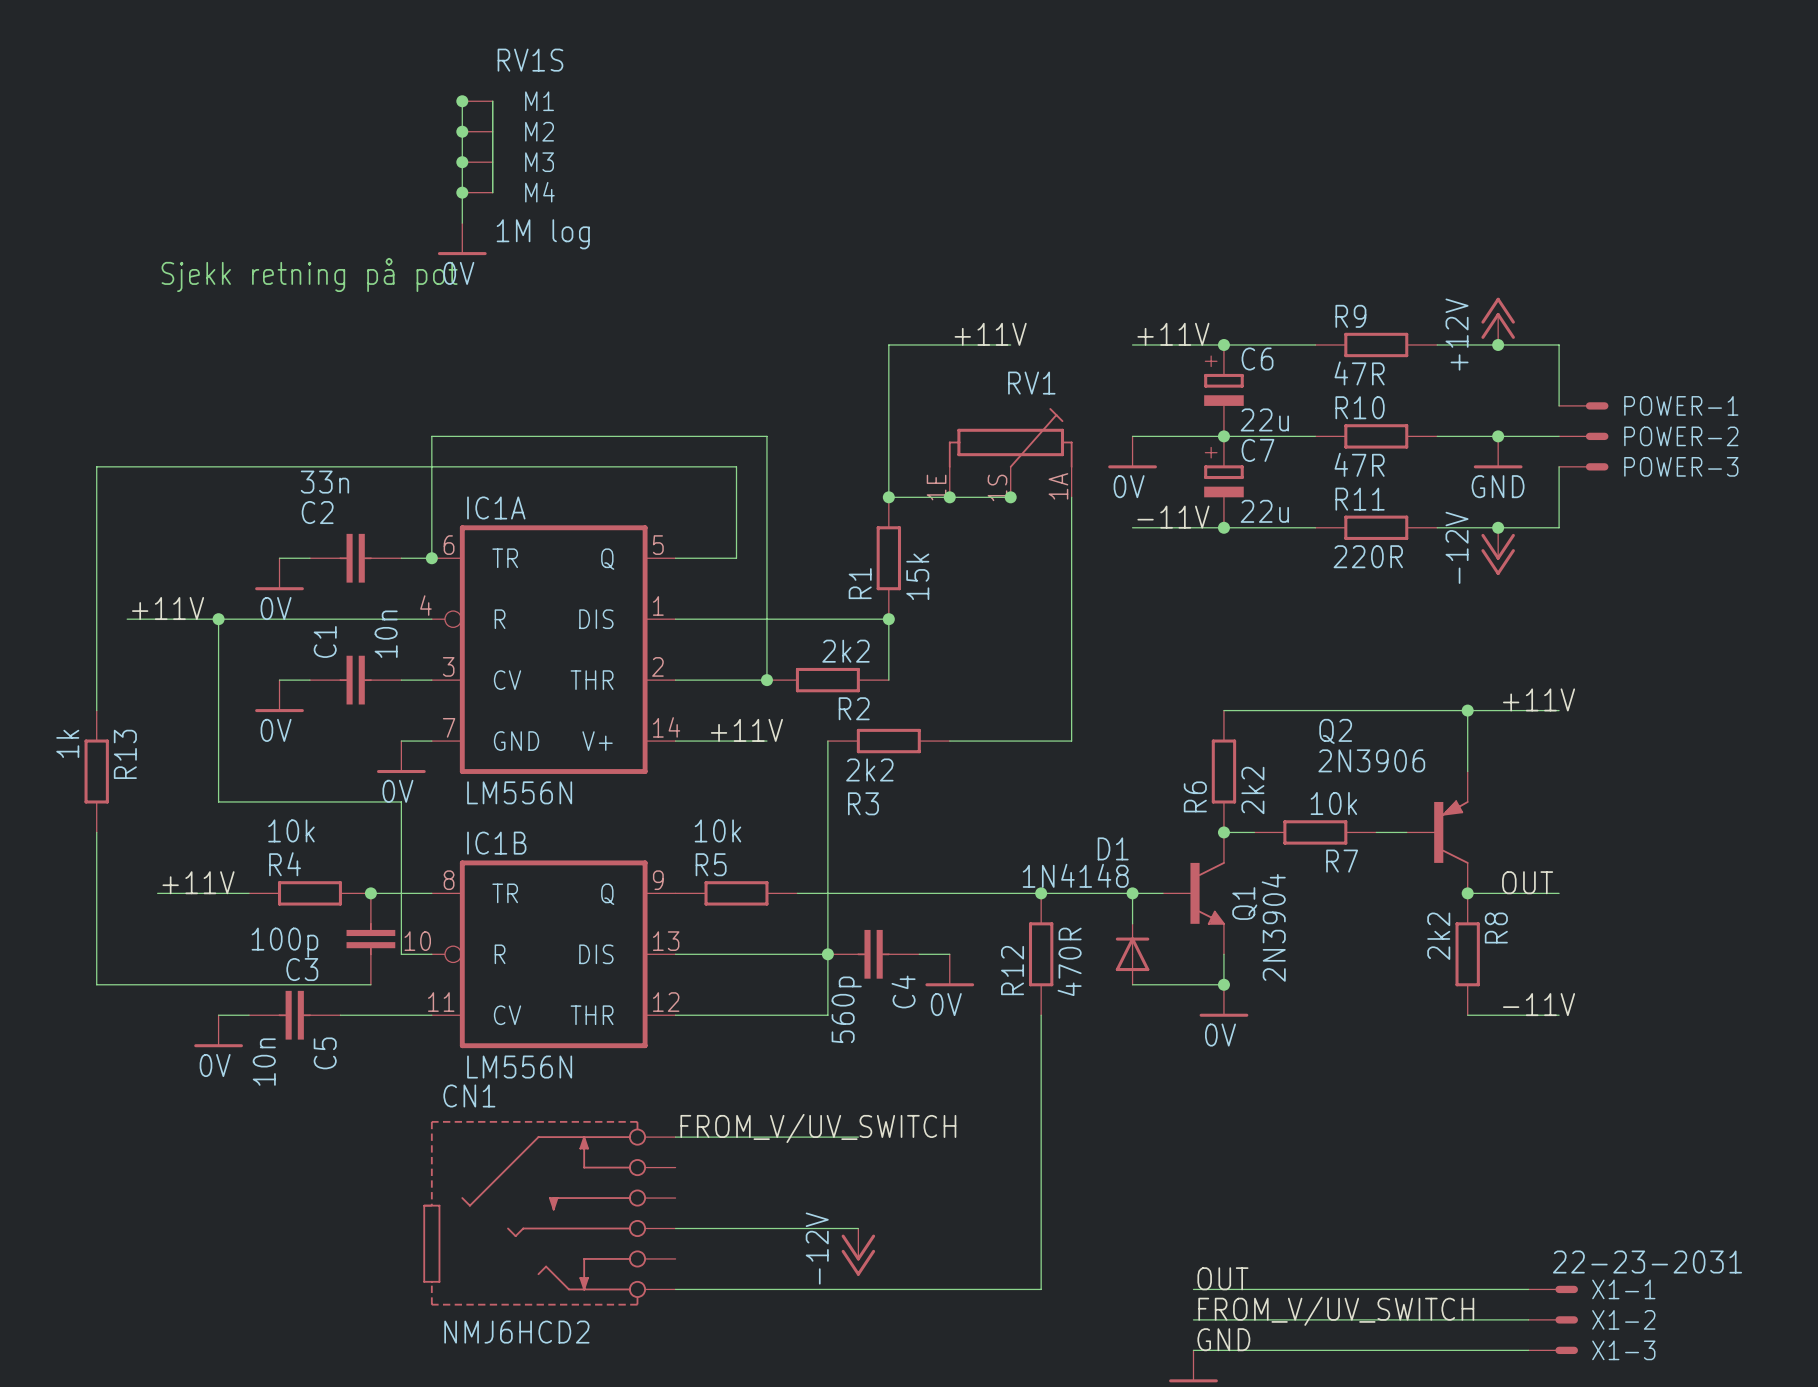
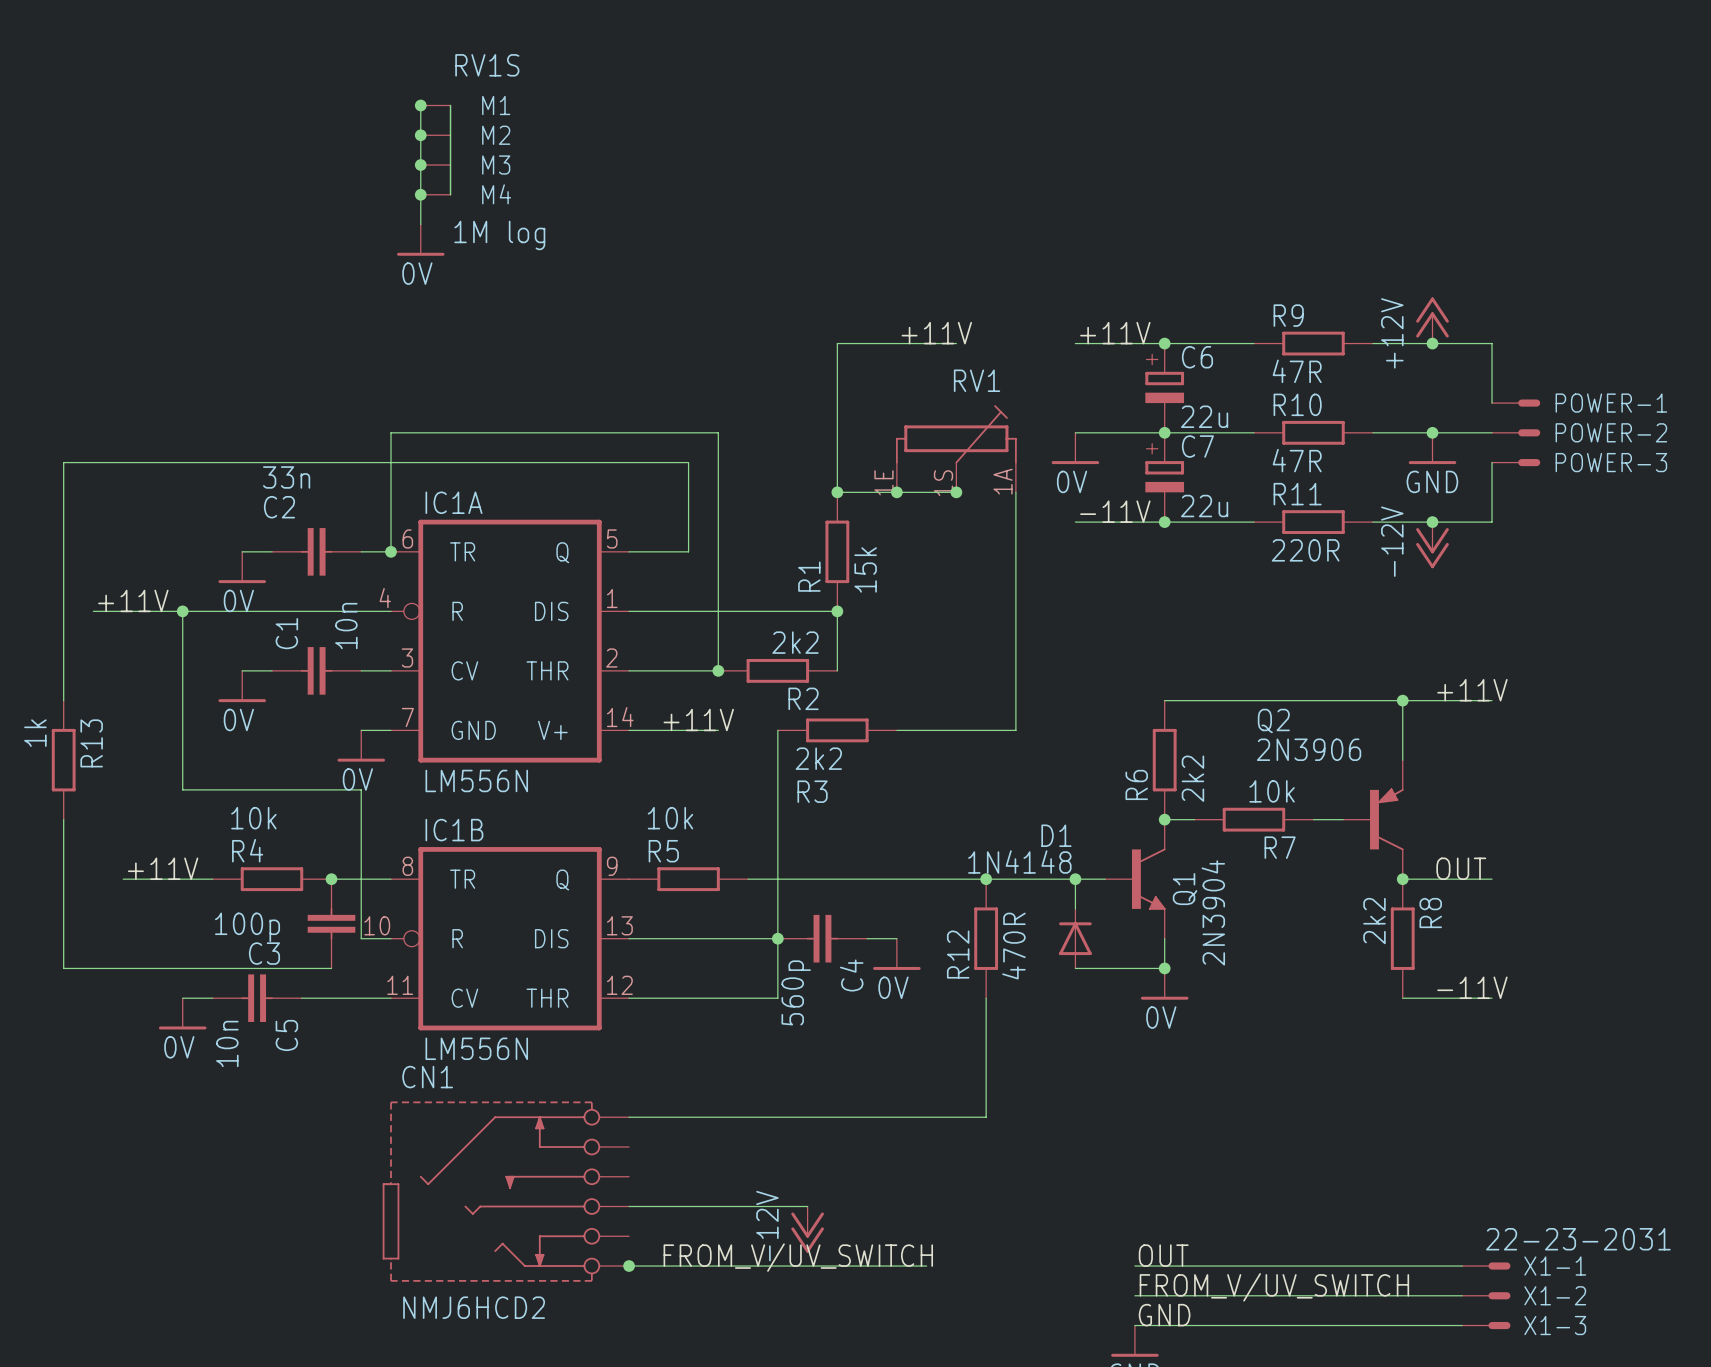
text: Sjekk retning på pot (309, 274) -> none
label position: FROM_V/UV_SWITCH (818, 1128) -> FROM_V/UV_SWITCH (798, 1257)
wire: (1041, 1137) (1041, 1289) (980, 1289) -> (986, 1117) (807, 1117)
junction: none -> (629, 1266)

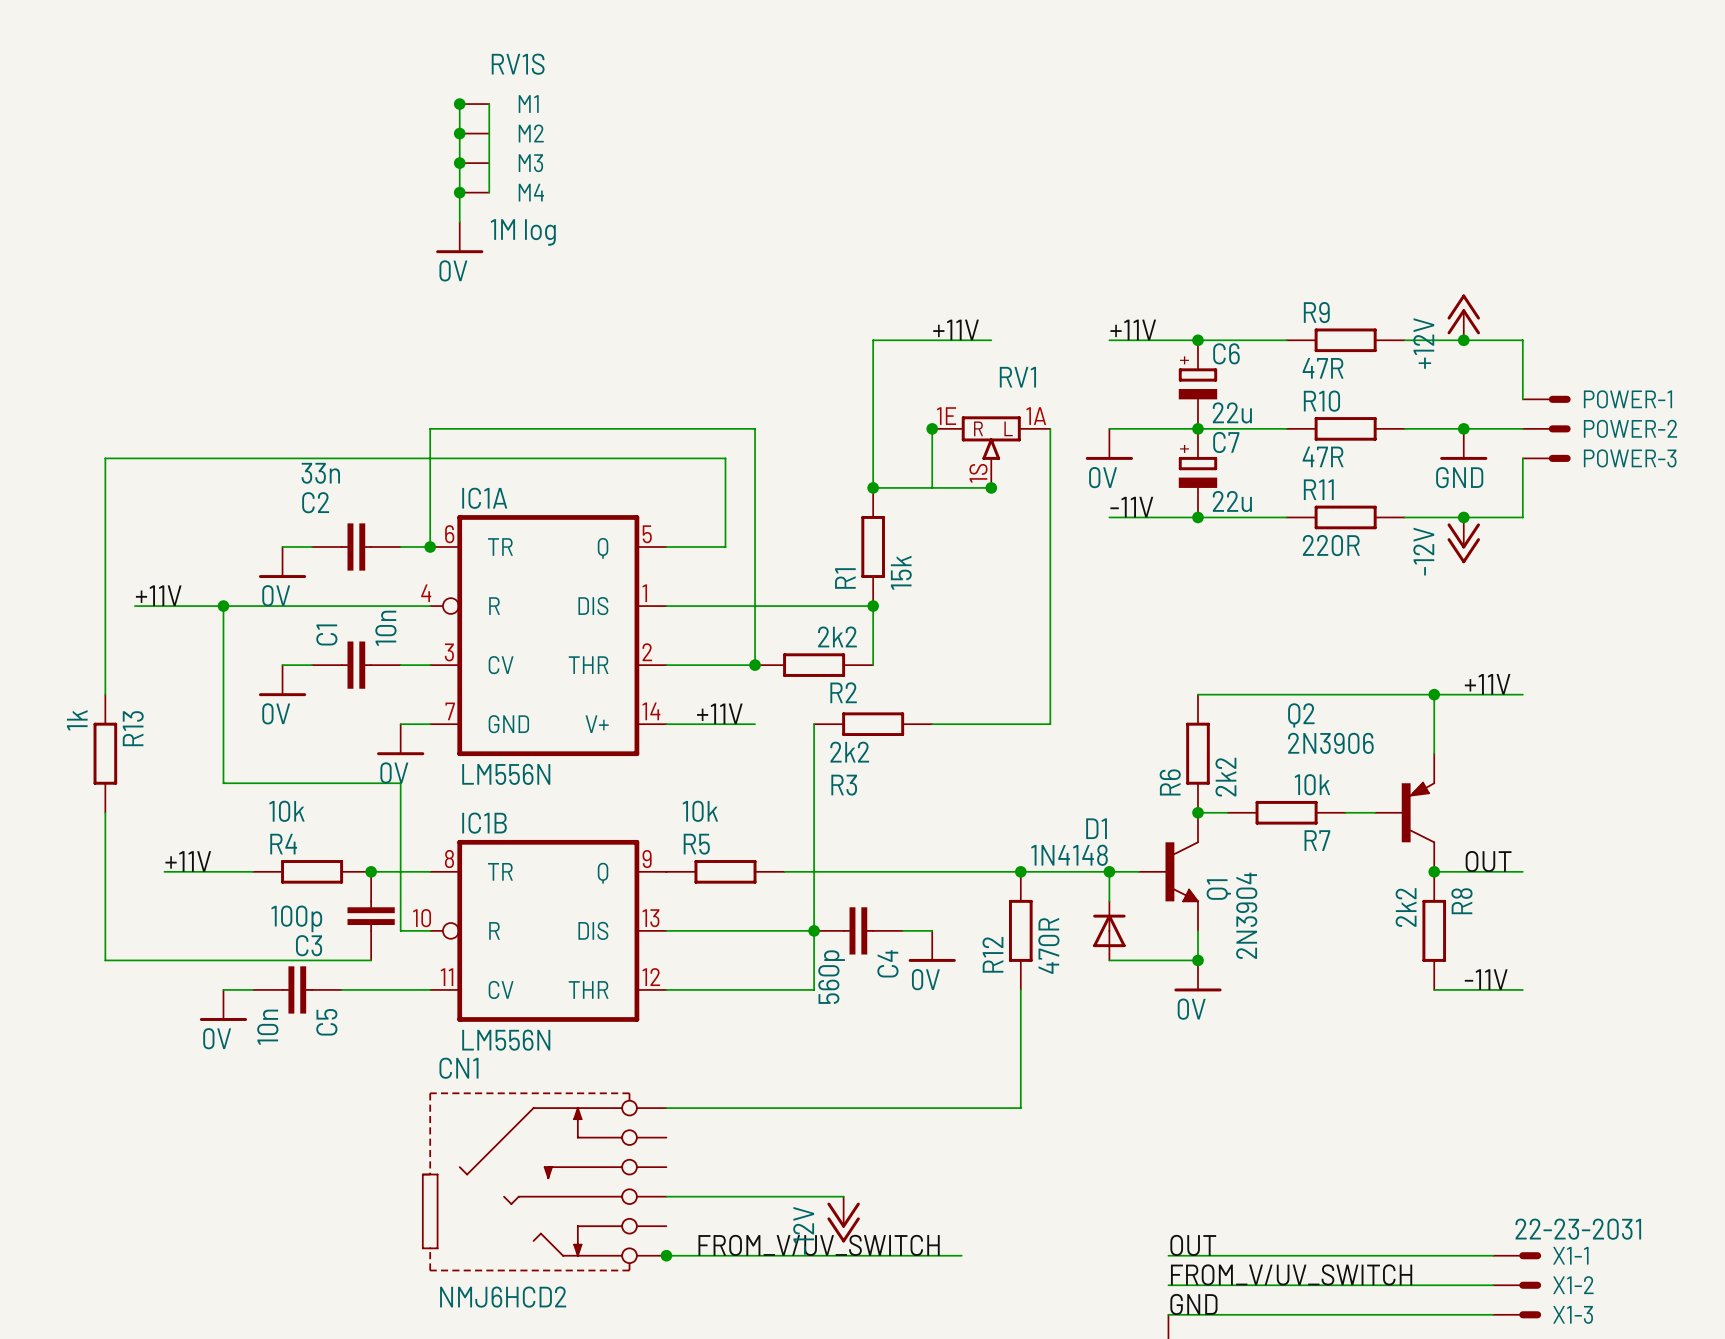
RV1 symbol: [895, 405, 1017, 493] -> [932, 416, 1051, 488]
junction position: (896, 492) -> (932, 428)

